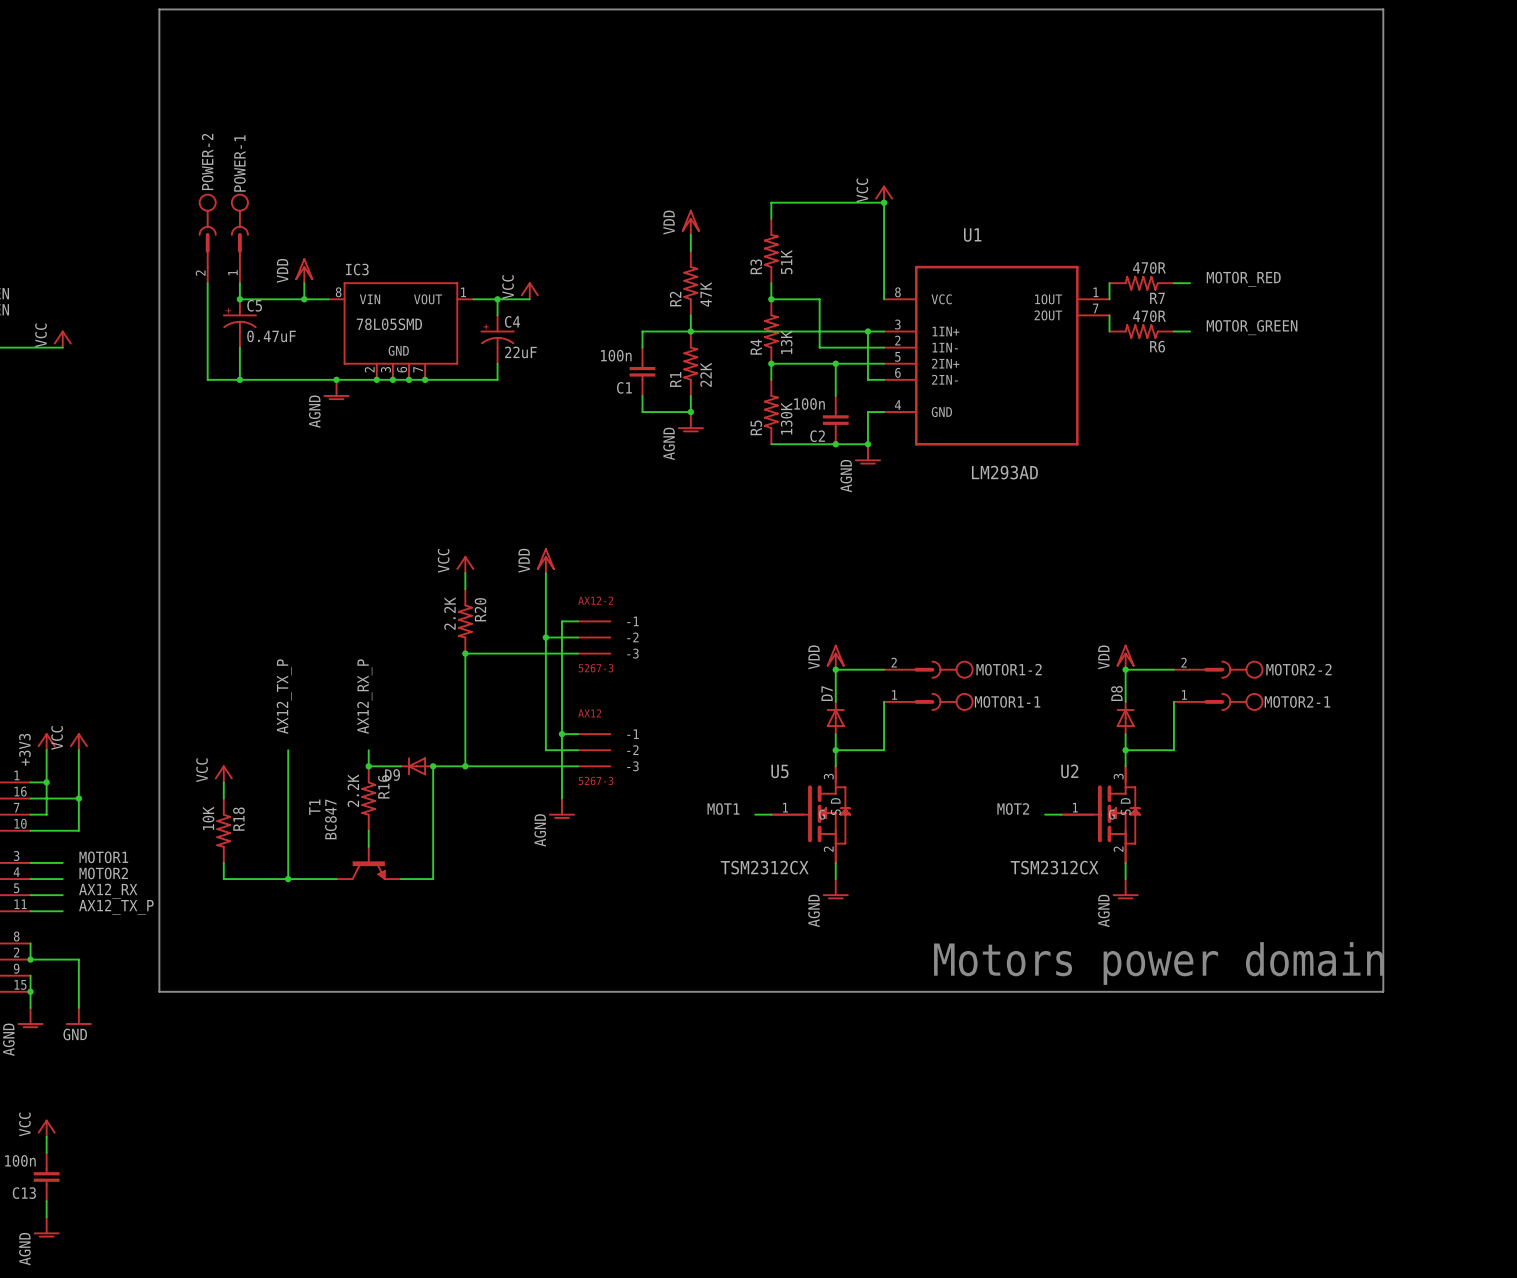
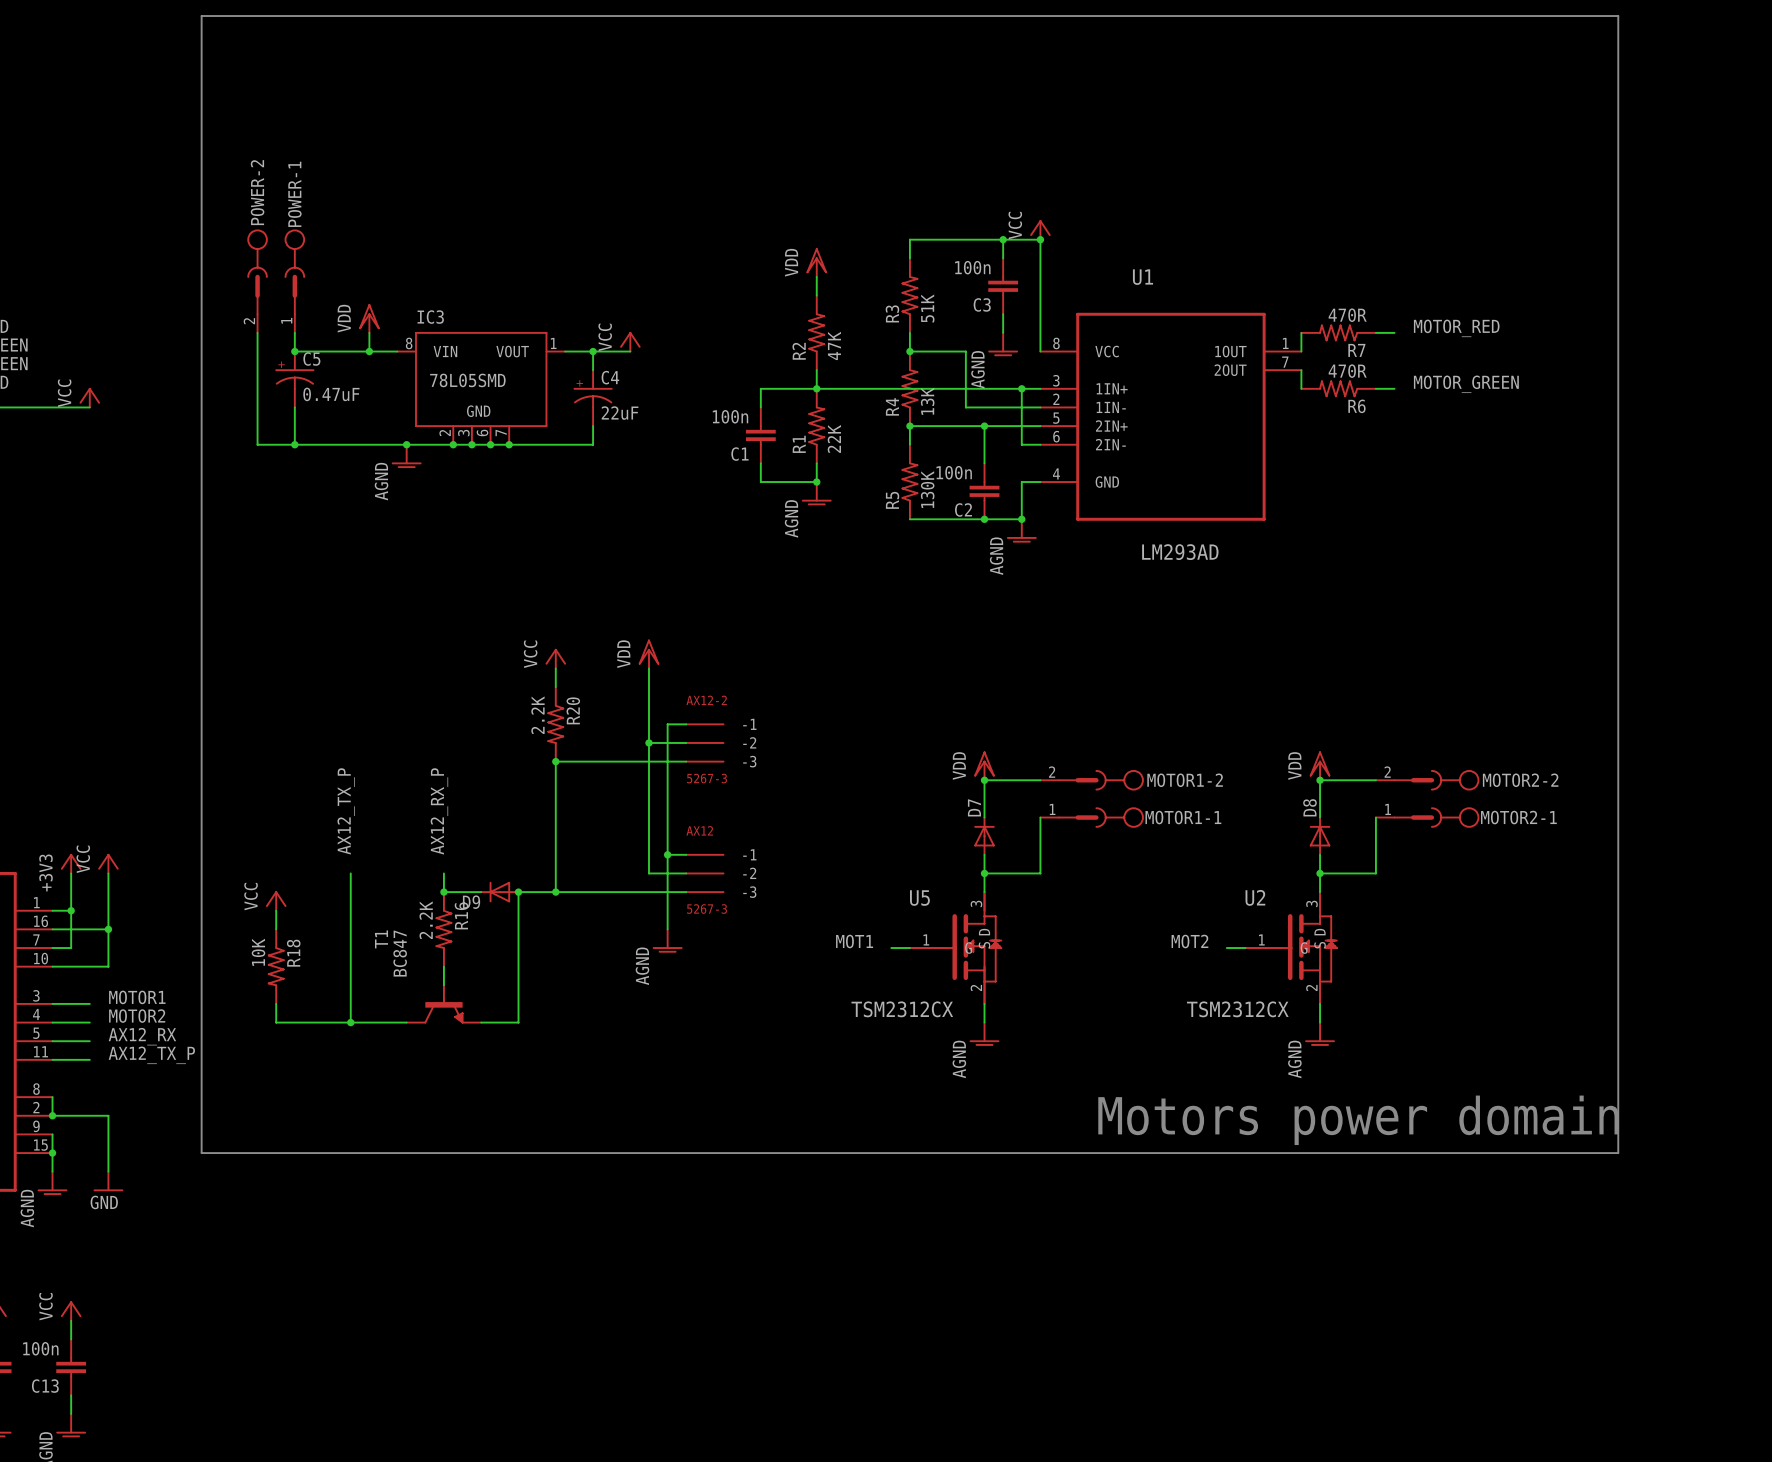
wire: none -> (1003, 239) (1003, 258)
junction: none -> (1003, 239)
C3: none -> 100n (1003, 286)
wire: none -> (1003, 314) (1003, 332)
power symbol: none -> AGND (1003, 344)

